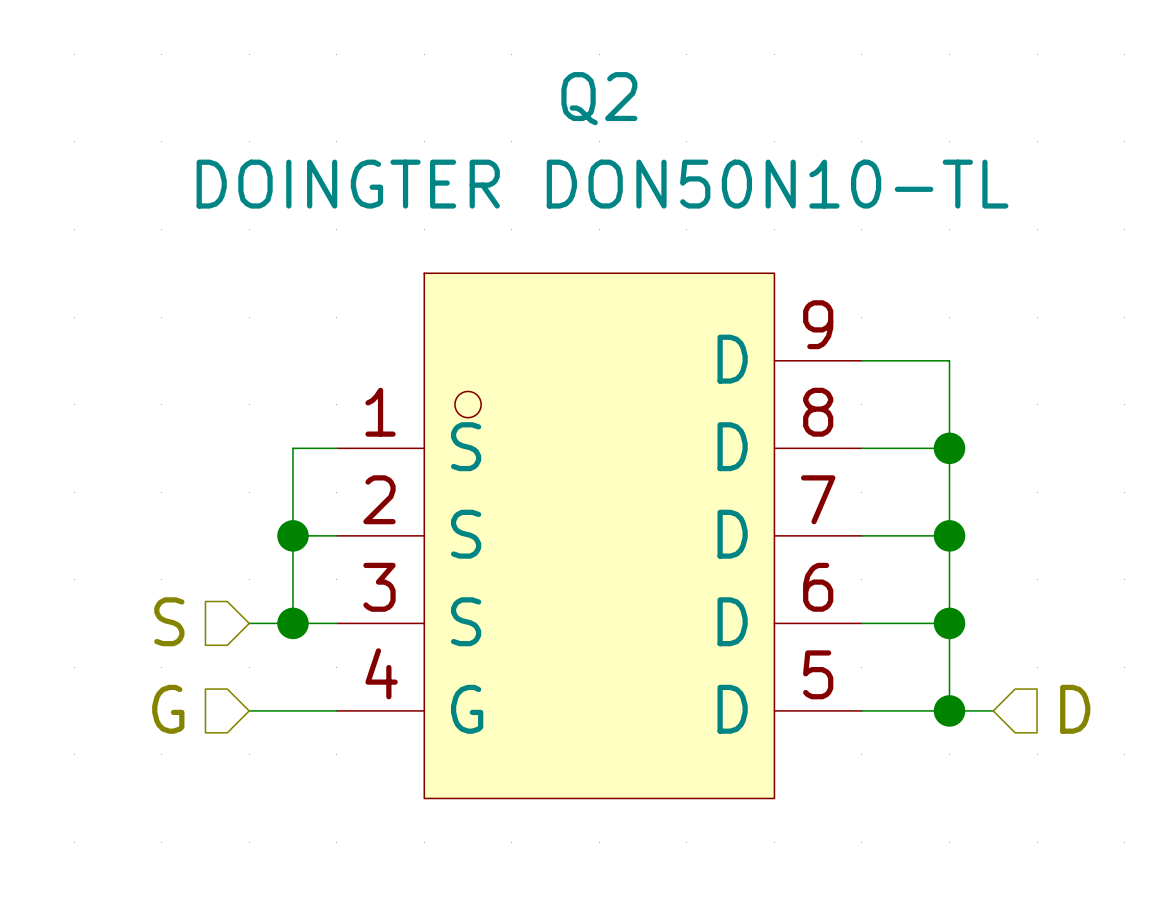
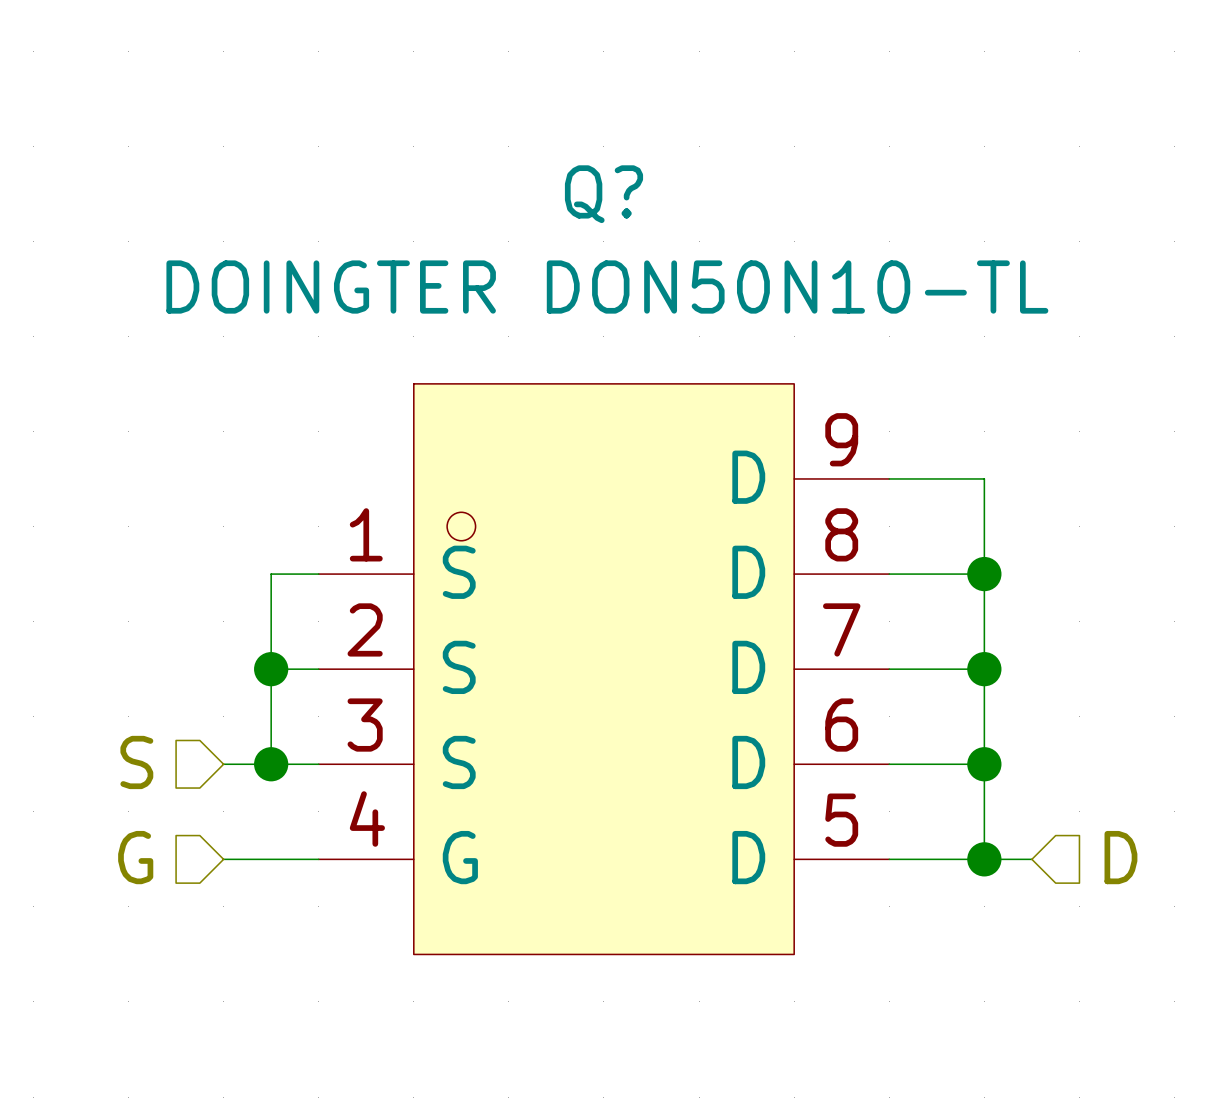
Q2 name: Q2 (599, 98) -> Q? (603, 194)

